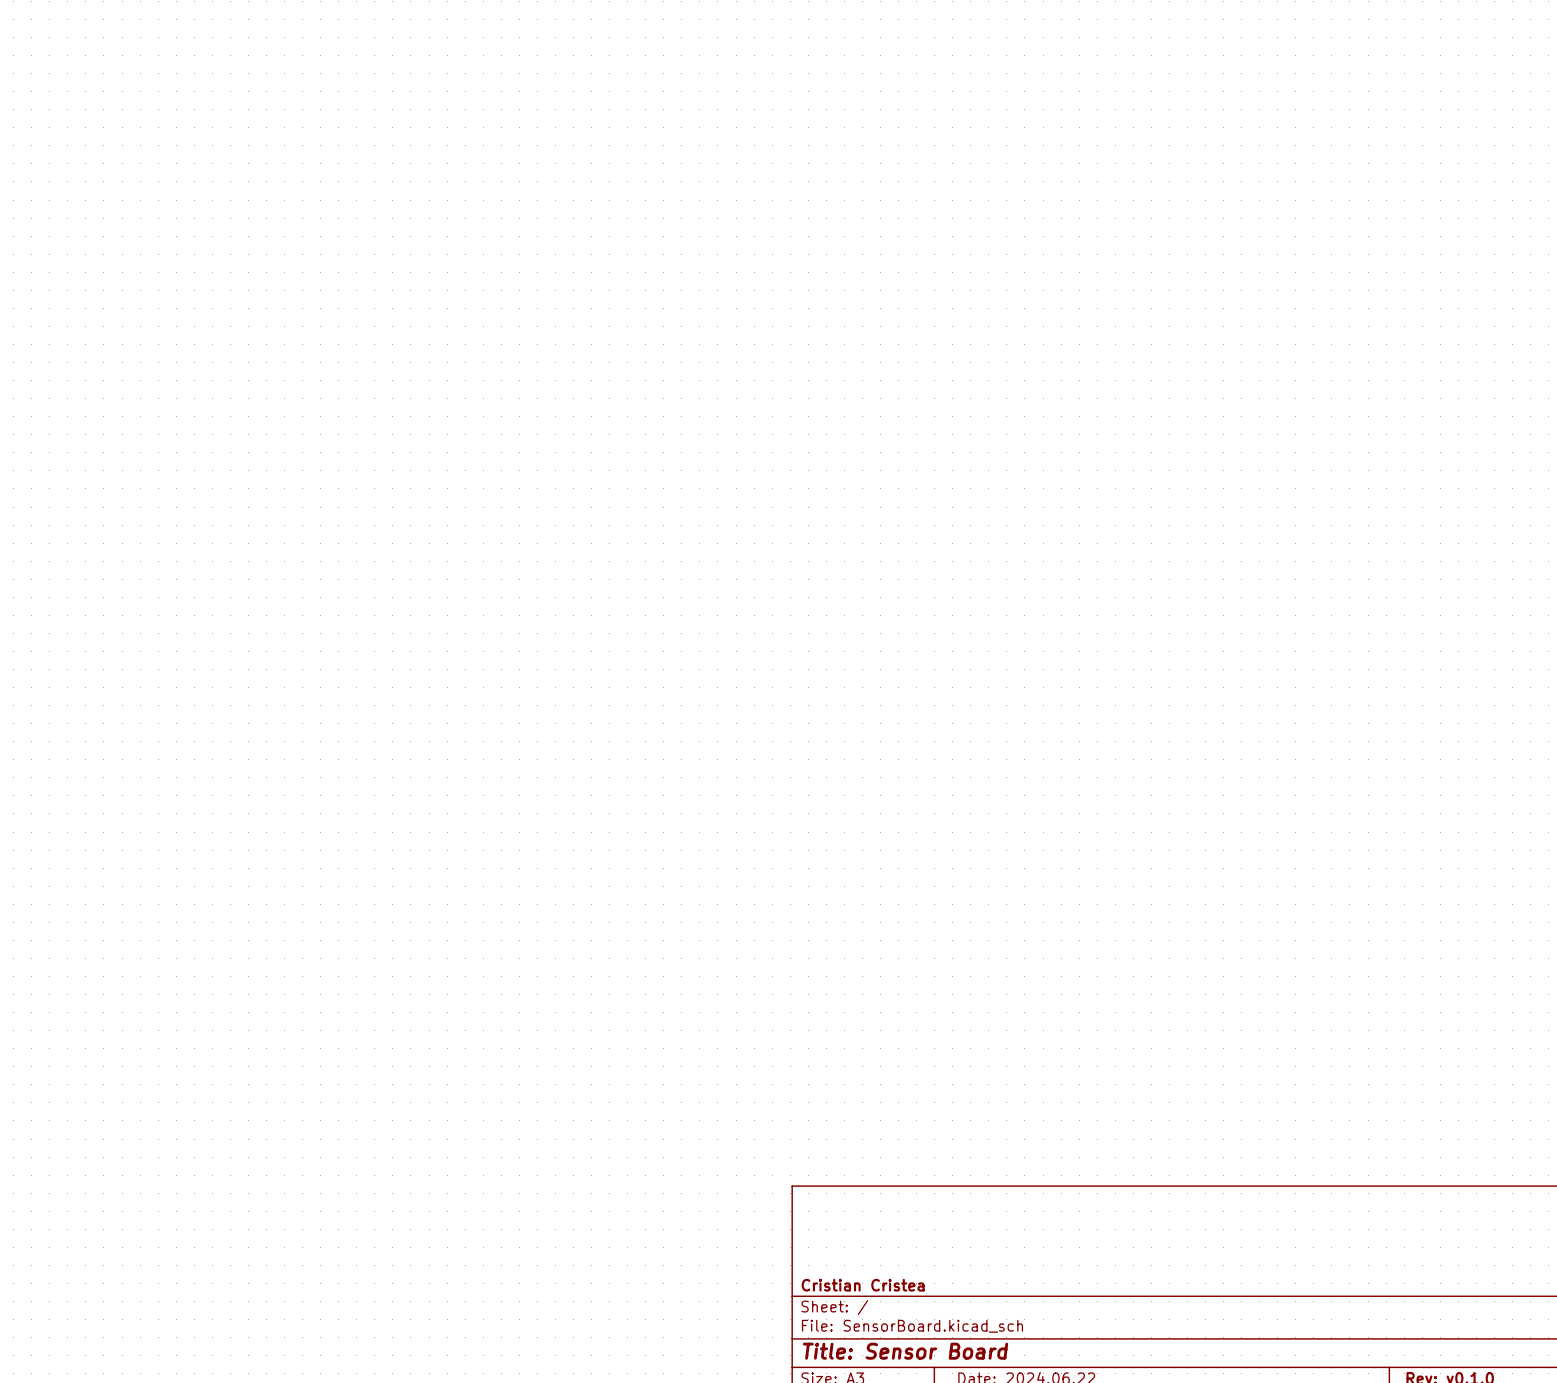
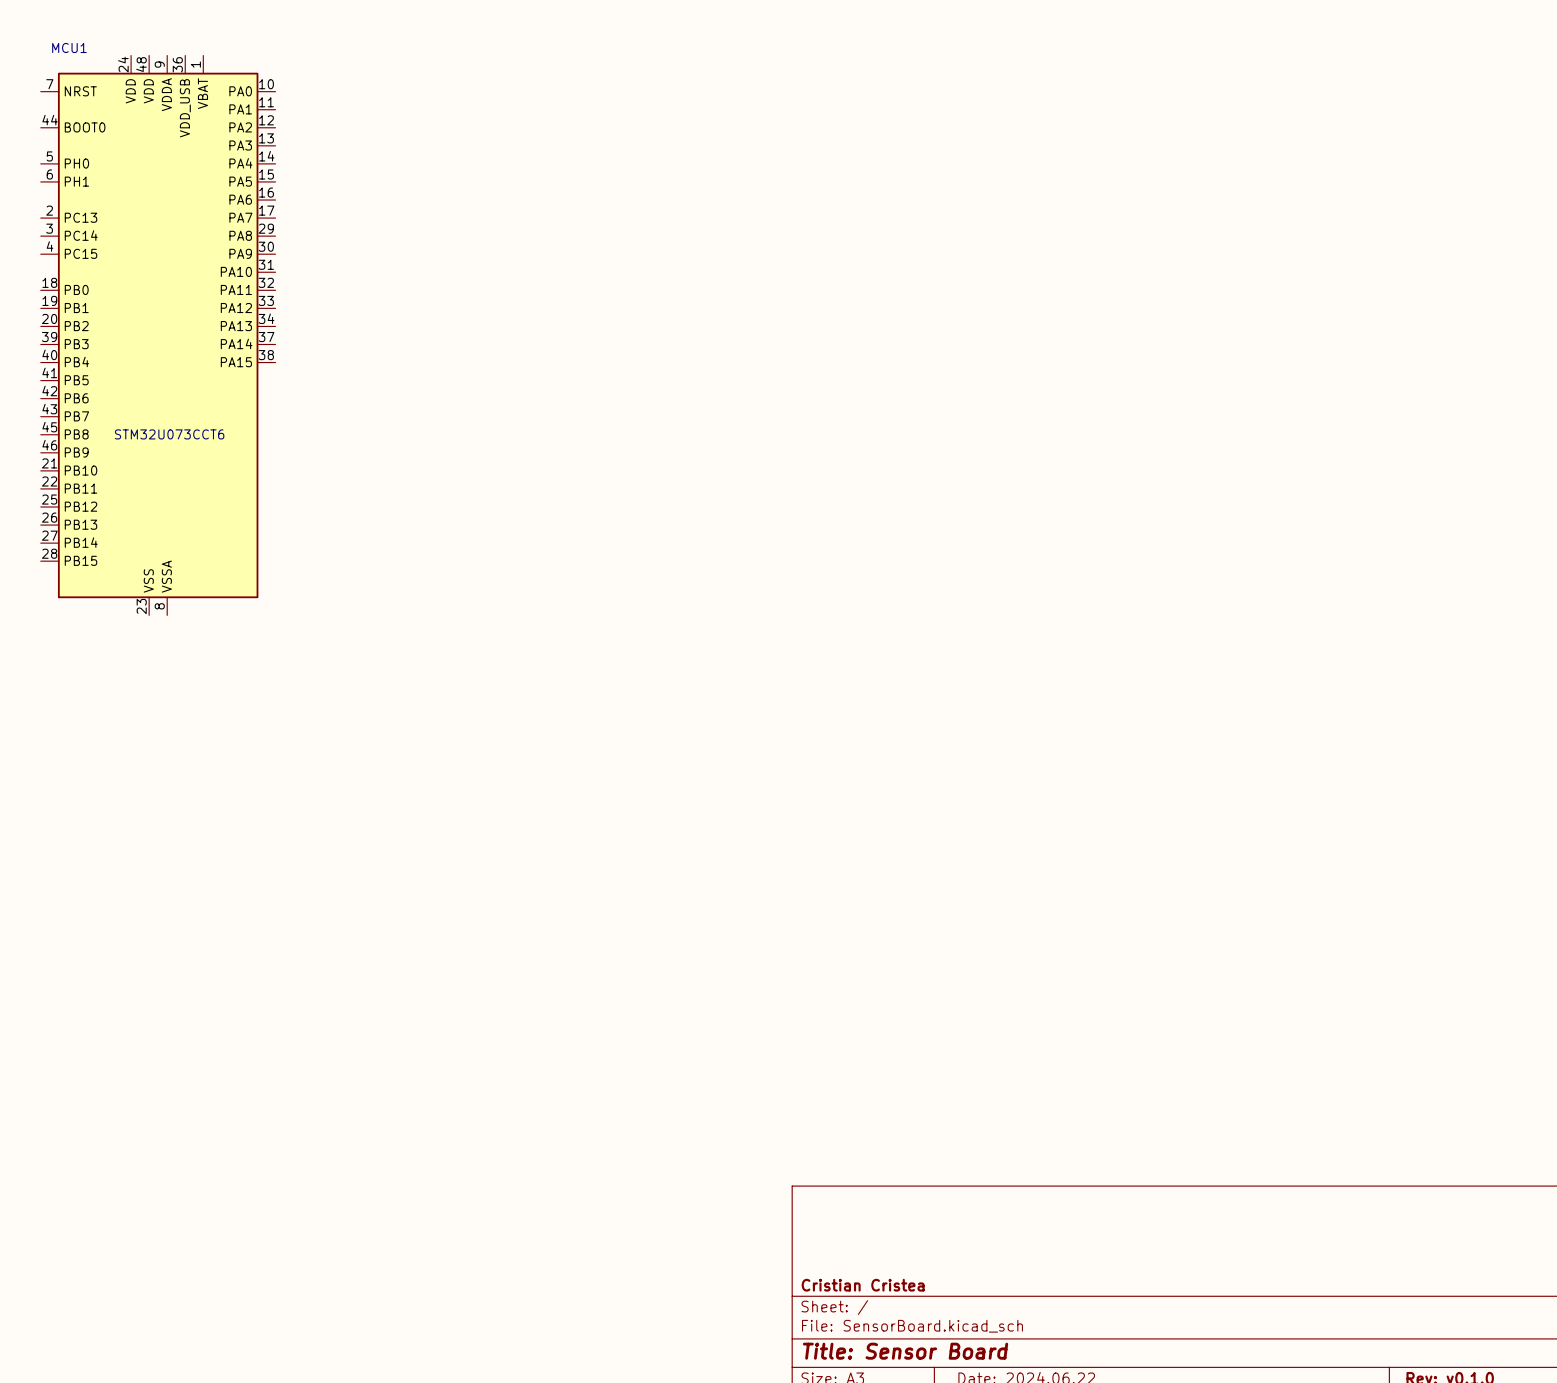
MCU1: none -> STM32U073CCT6 (158, 335)

